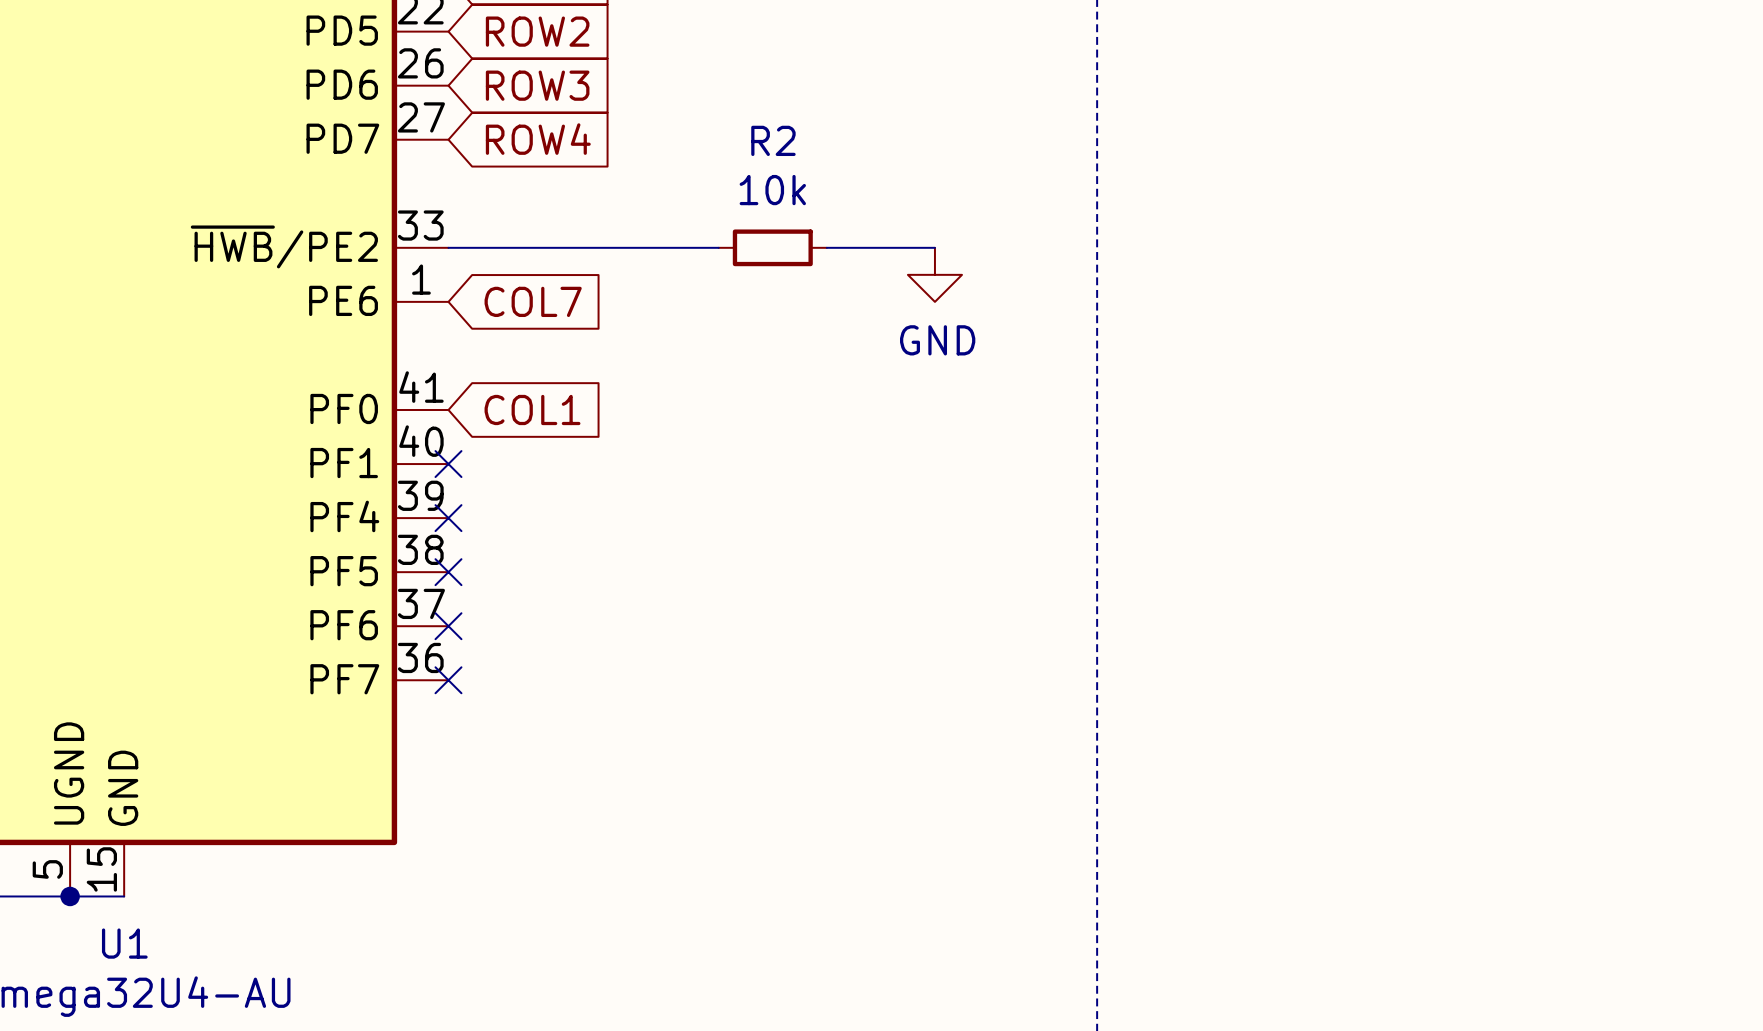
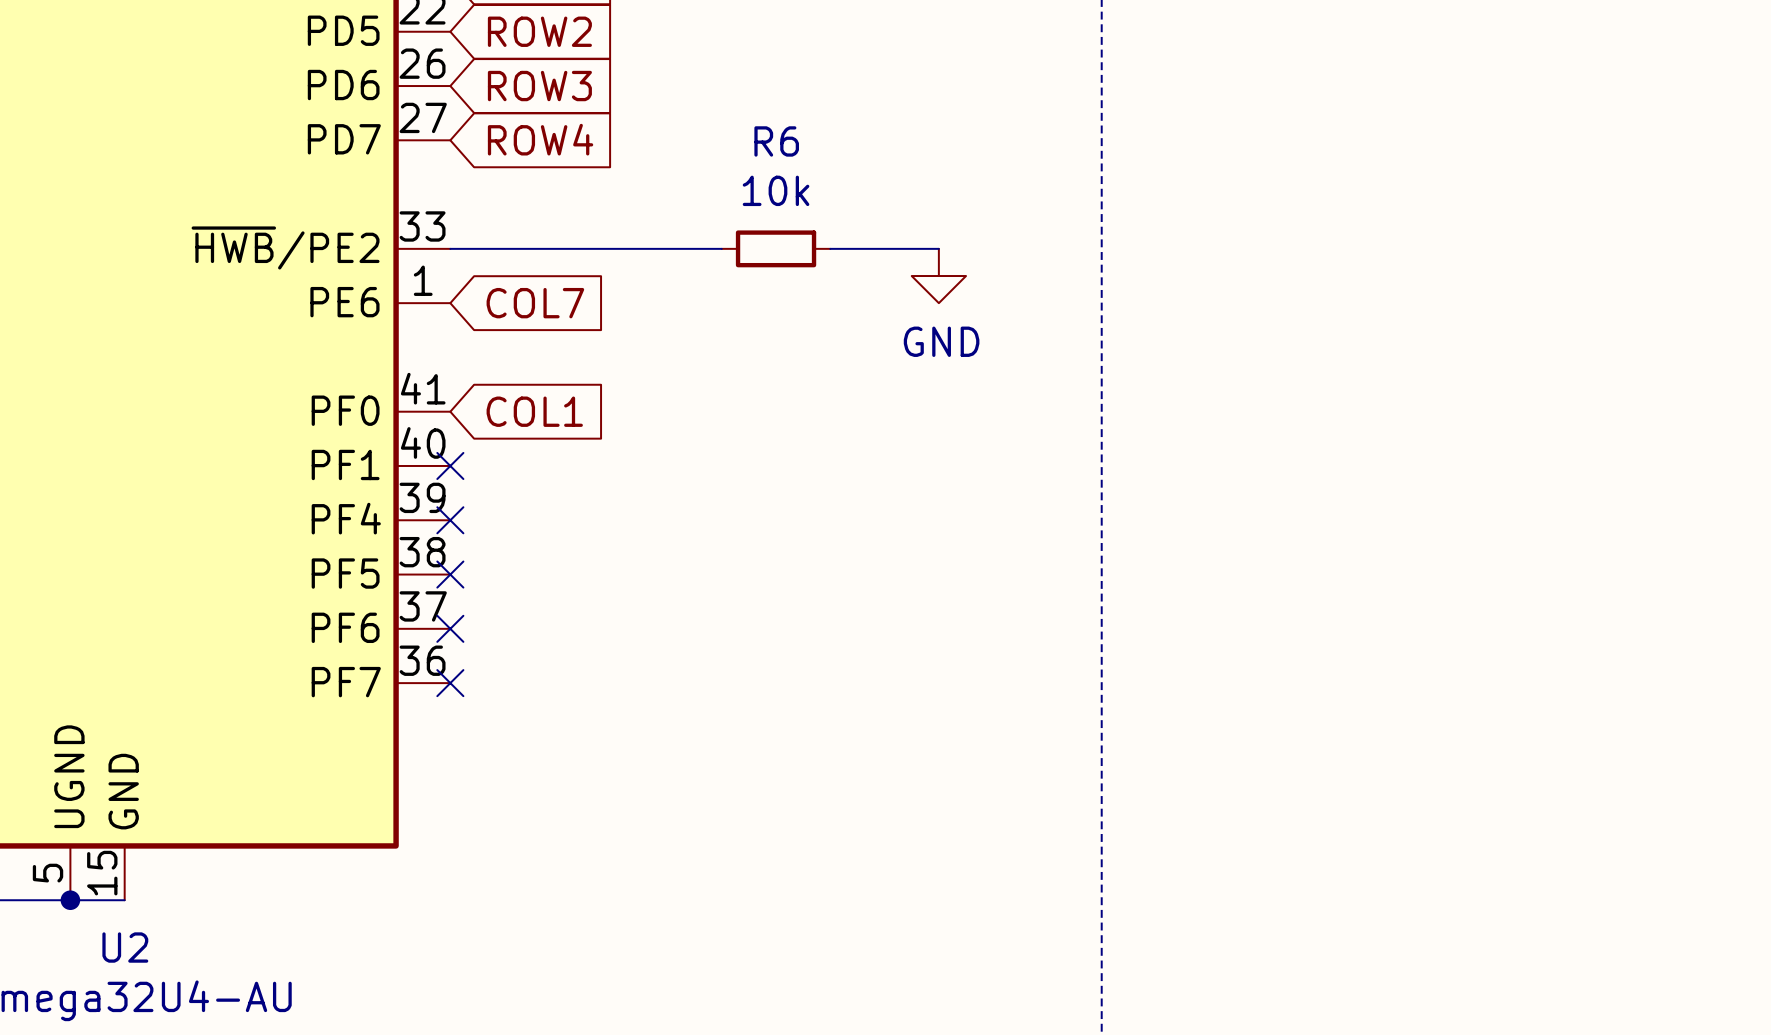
R2 name: R2 (773, 140) -> R6 (776, 141)
U1 name: U1 (124, 943) -> U2 (125, 947)

